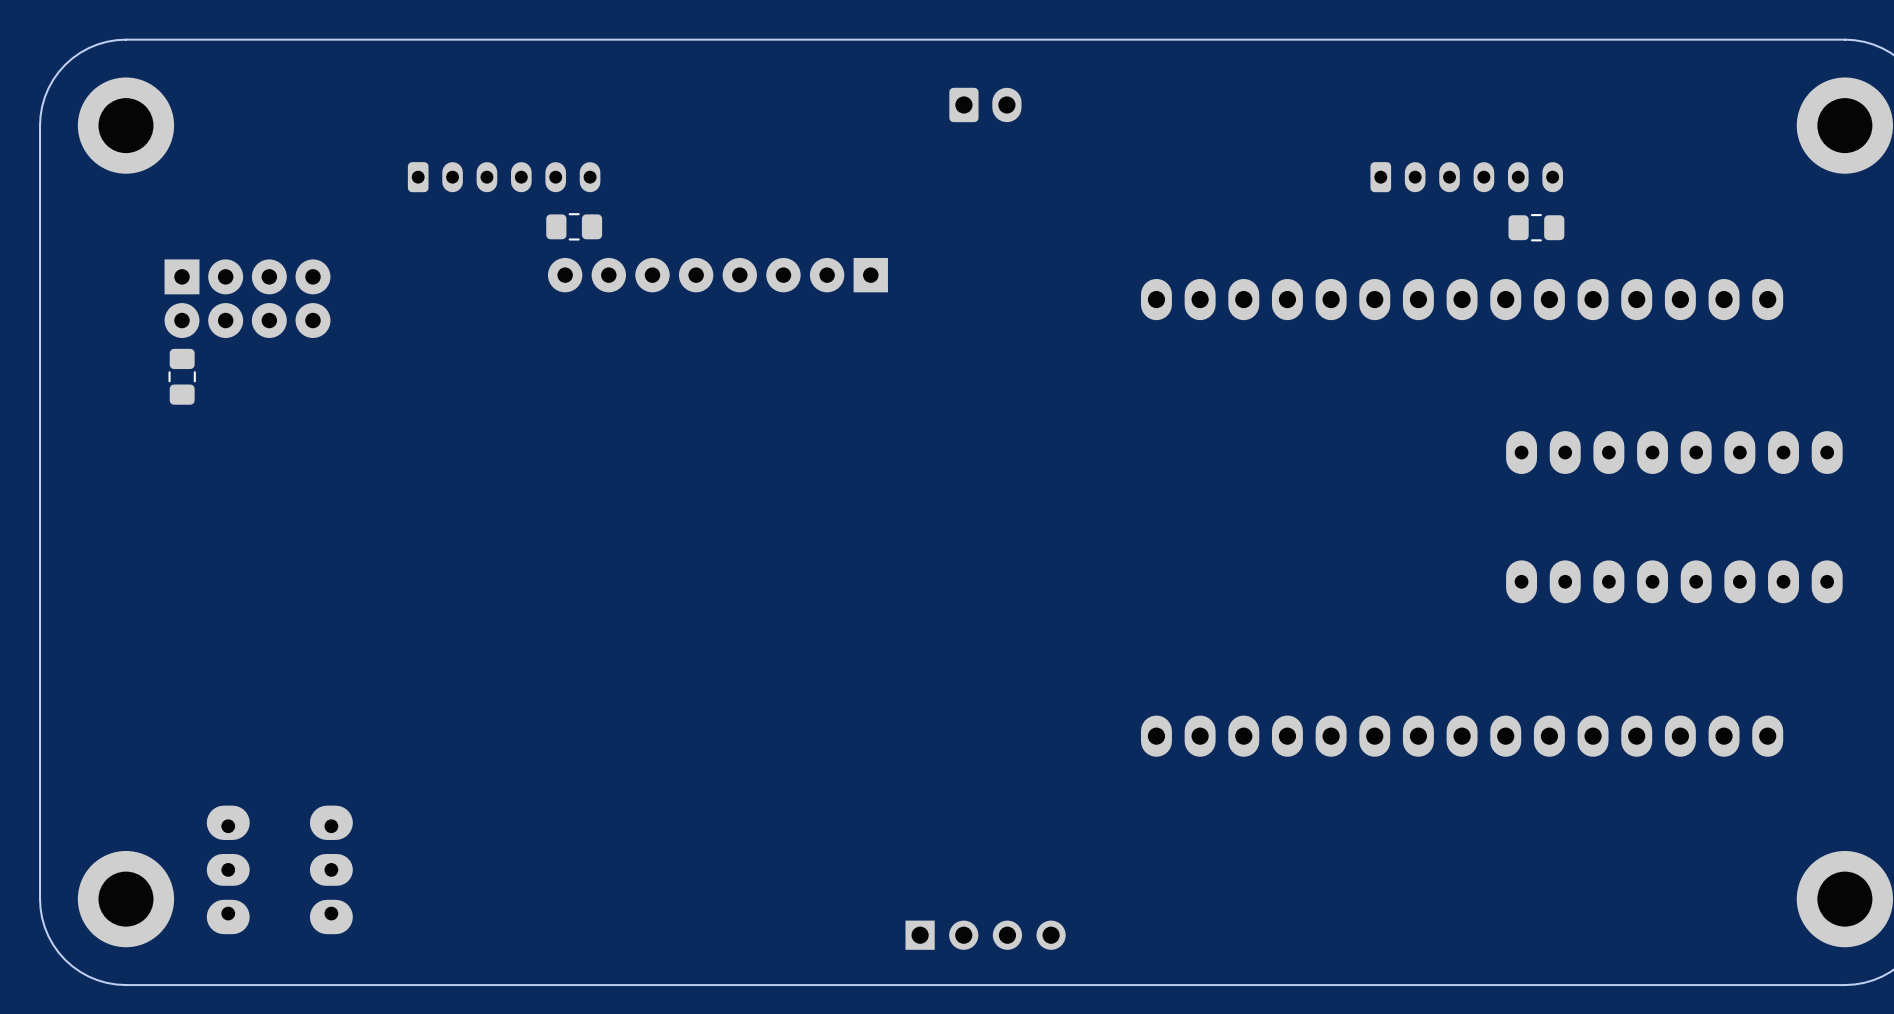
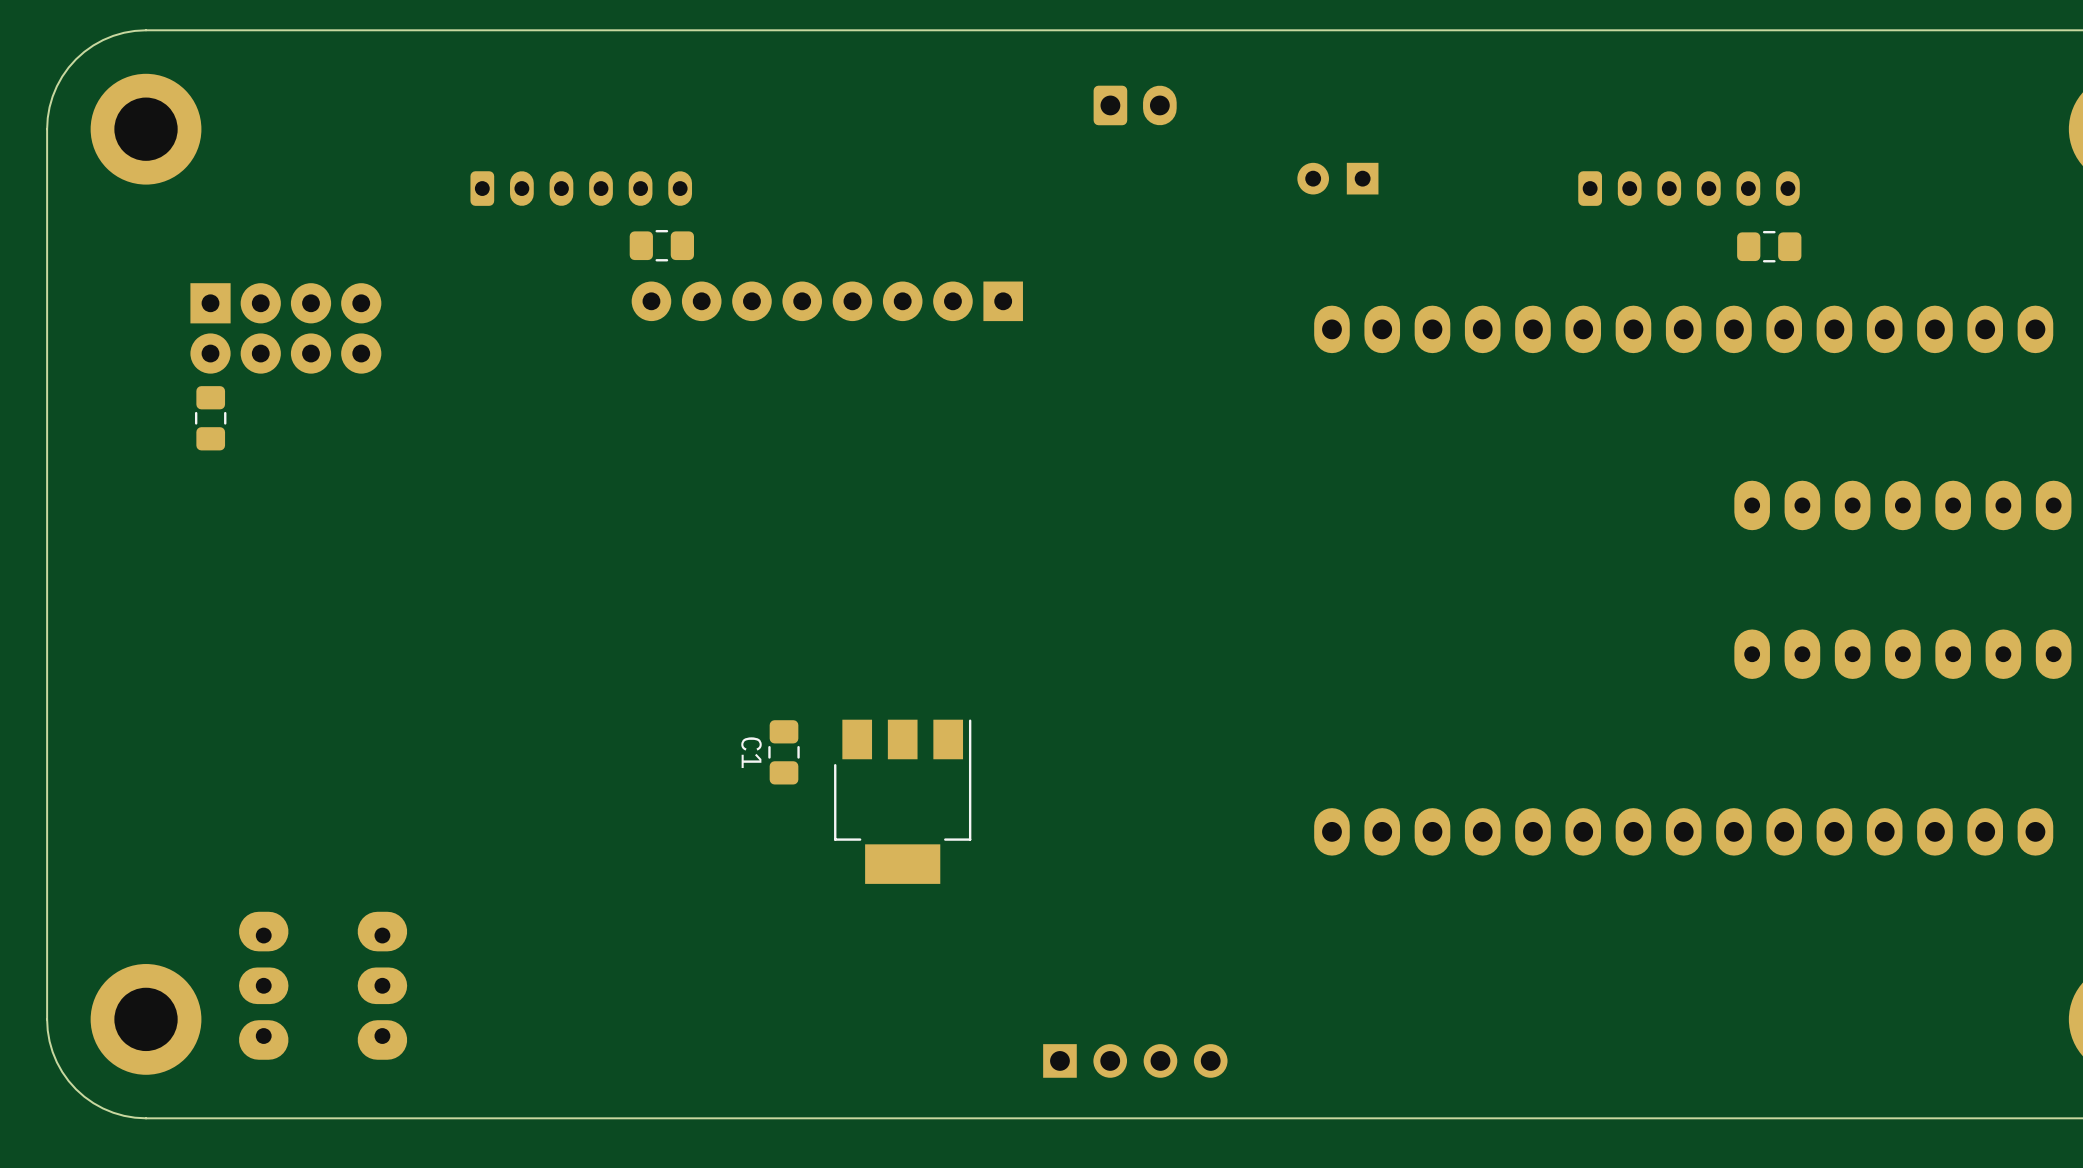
part: none -> (1337, 178)
C1: none -> (784, 752)
part: none -> (902, 801)

